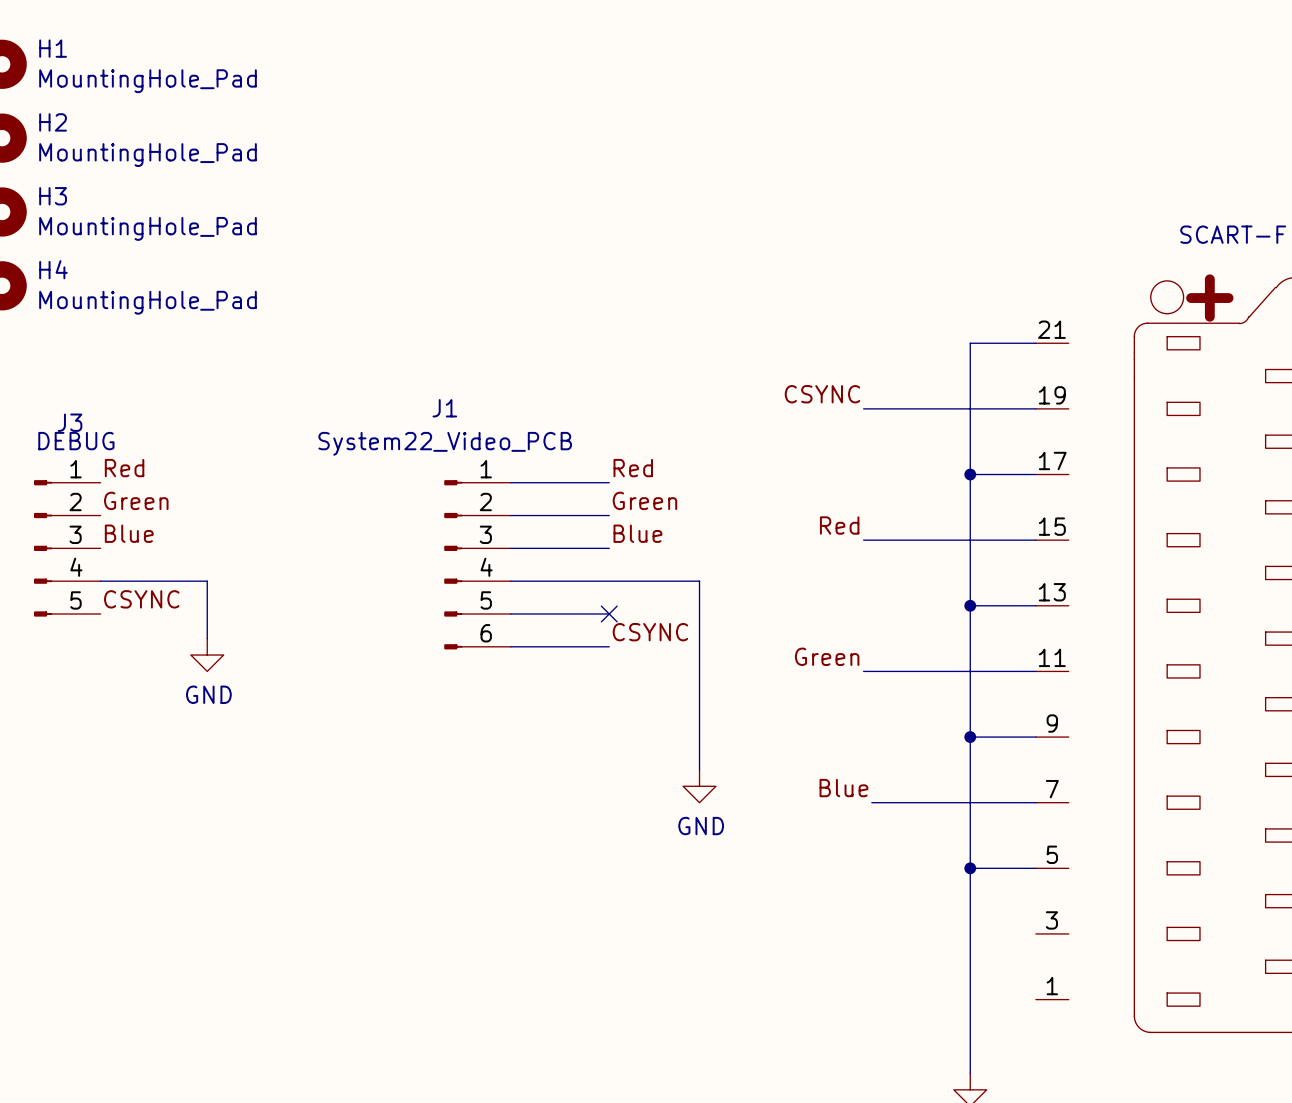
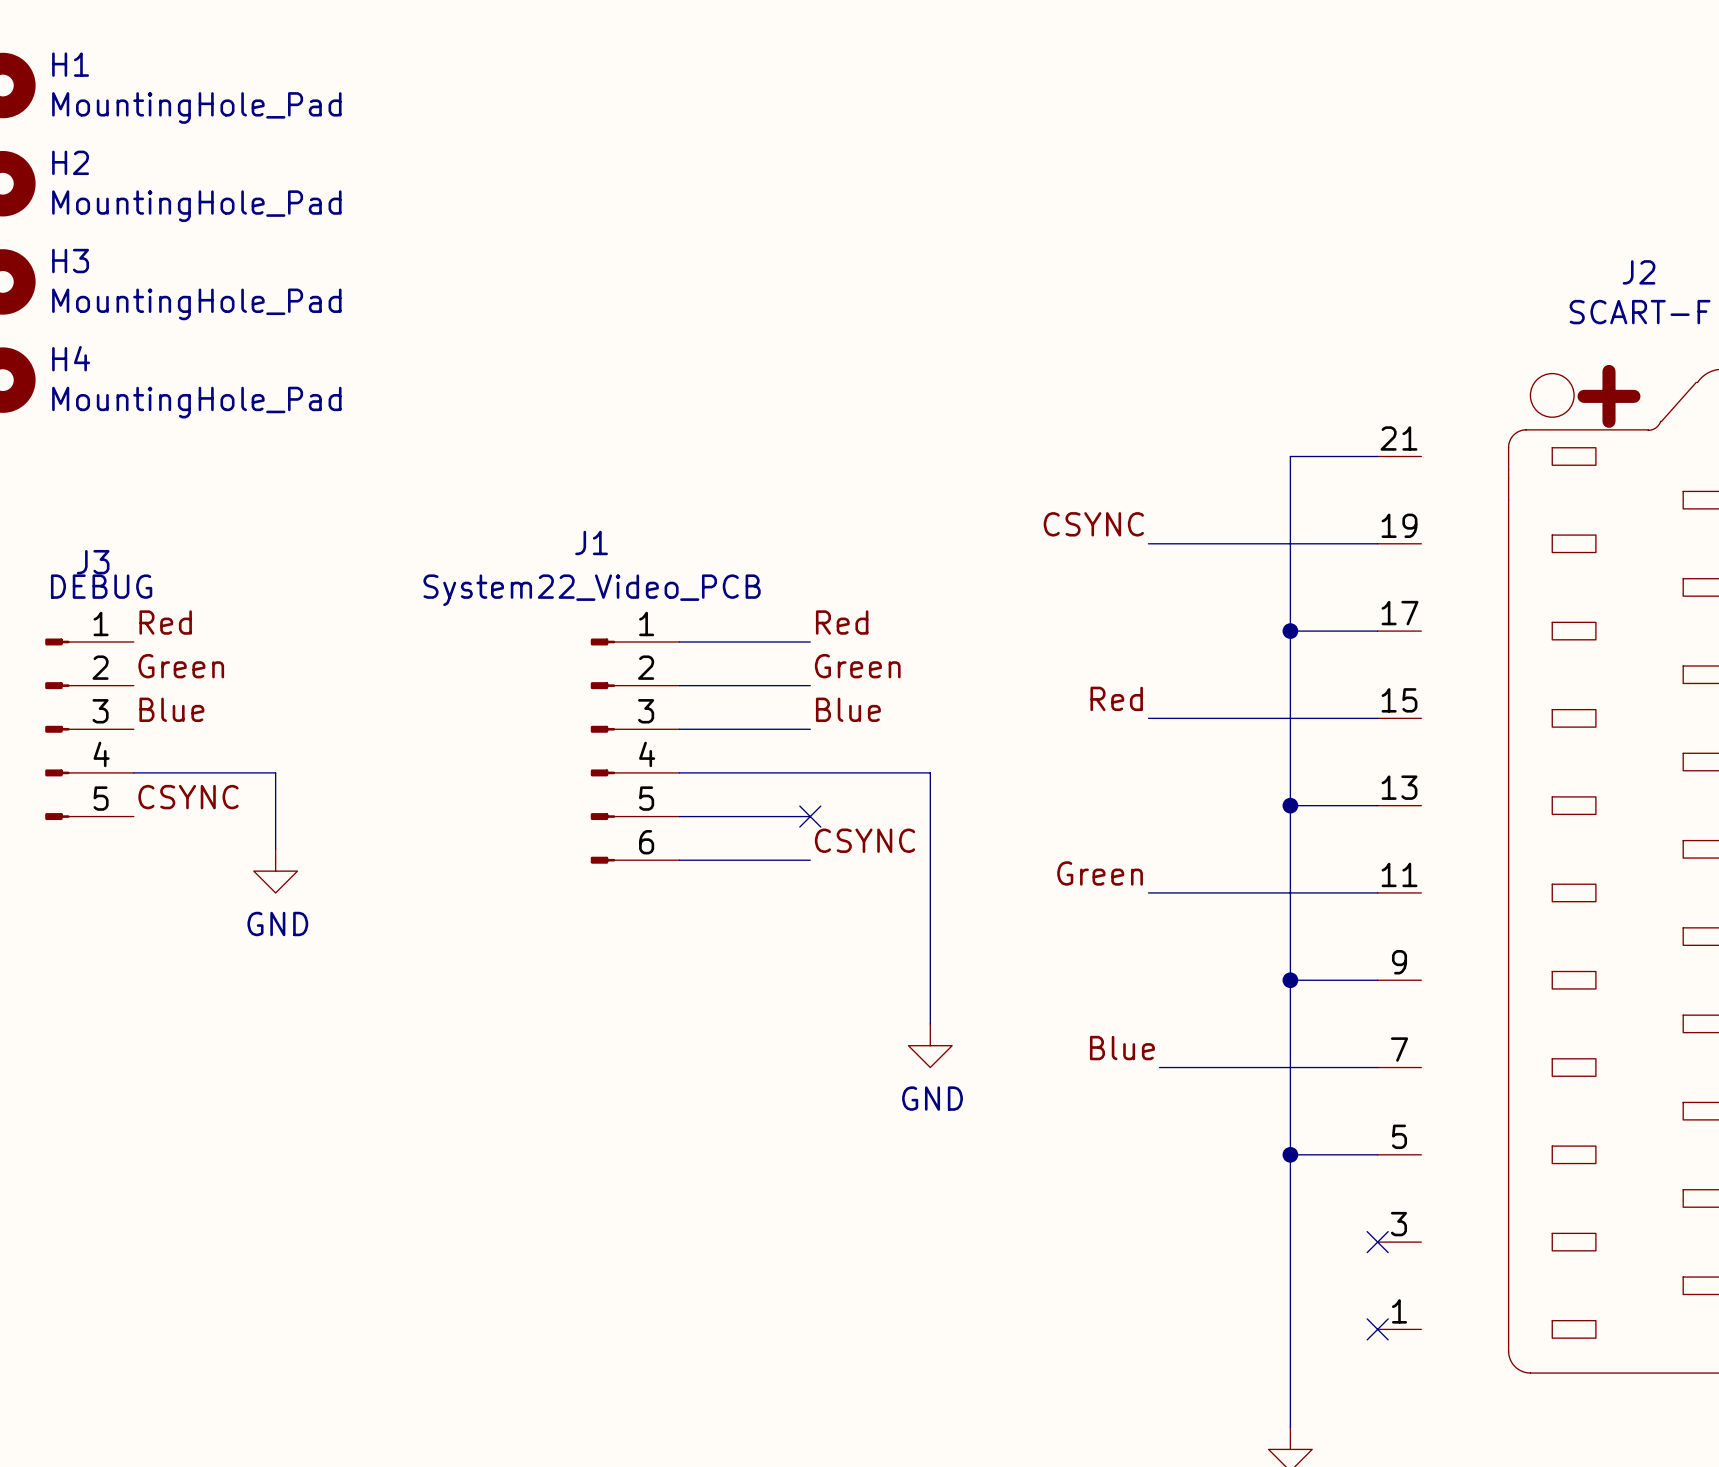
J2 name: none -> J2 (1639, 272)
no-connect mark: none -> (1377, 1242)
no-connect mark: none -> (1377, 1329)

